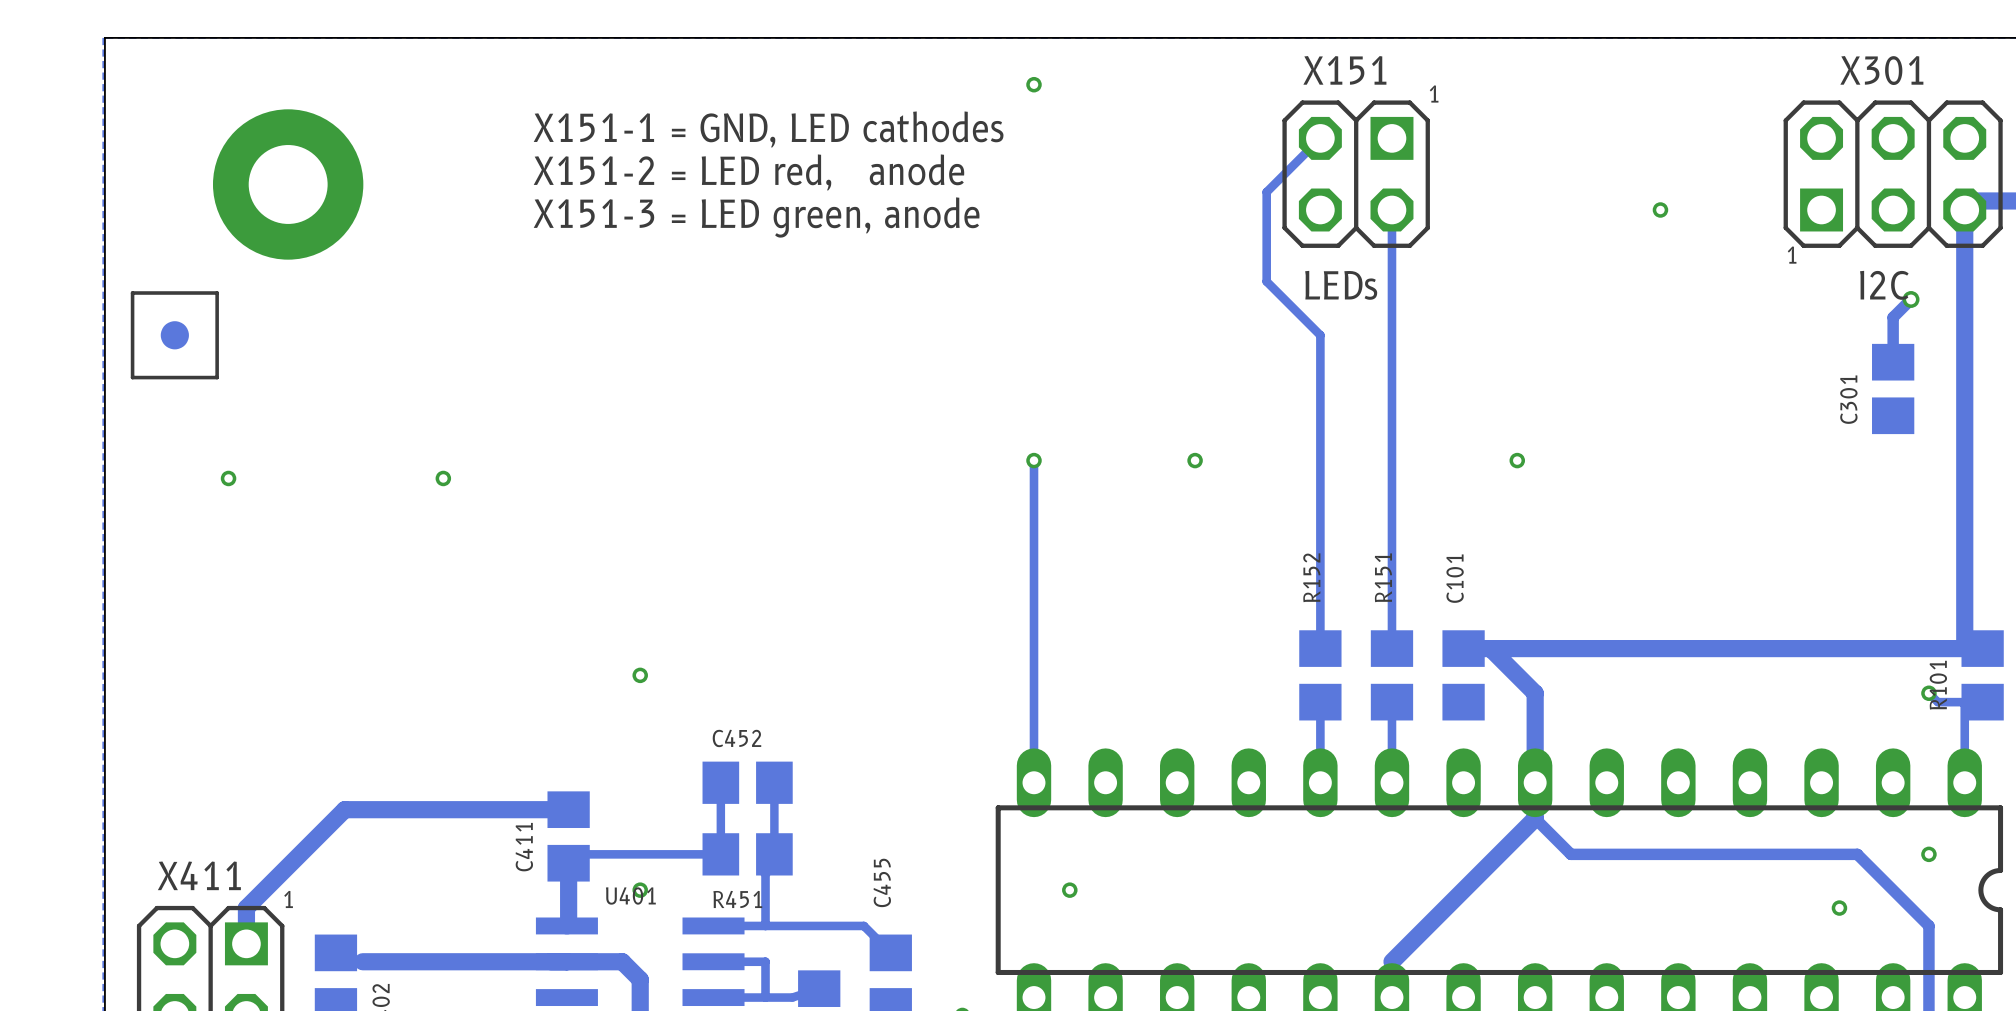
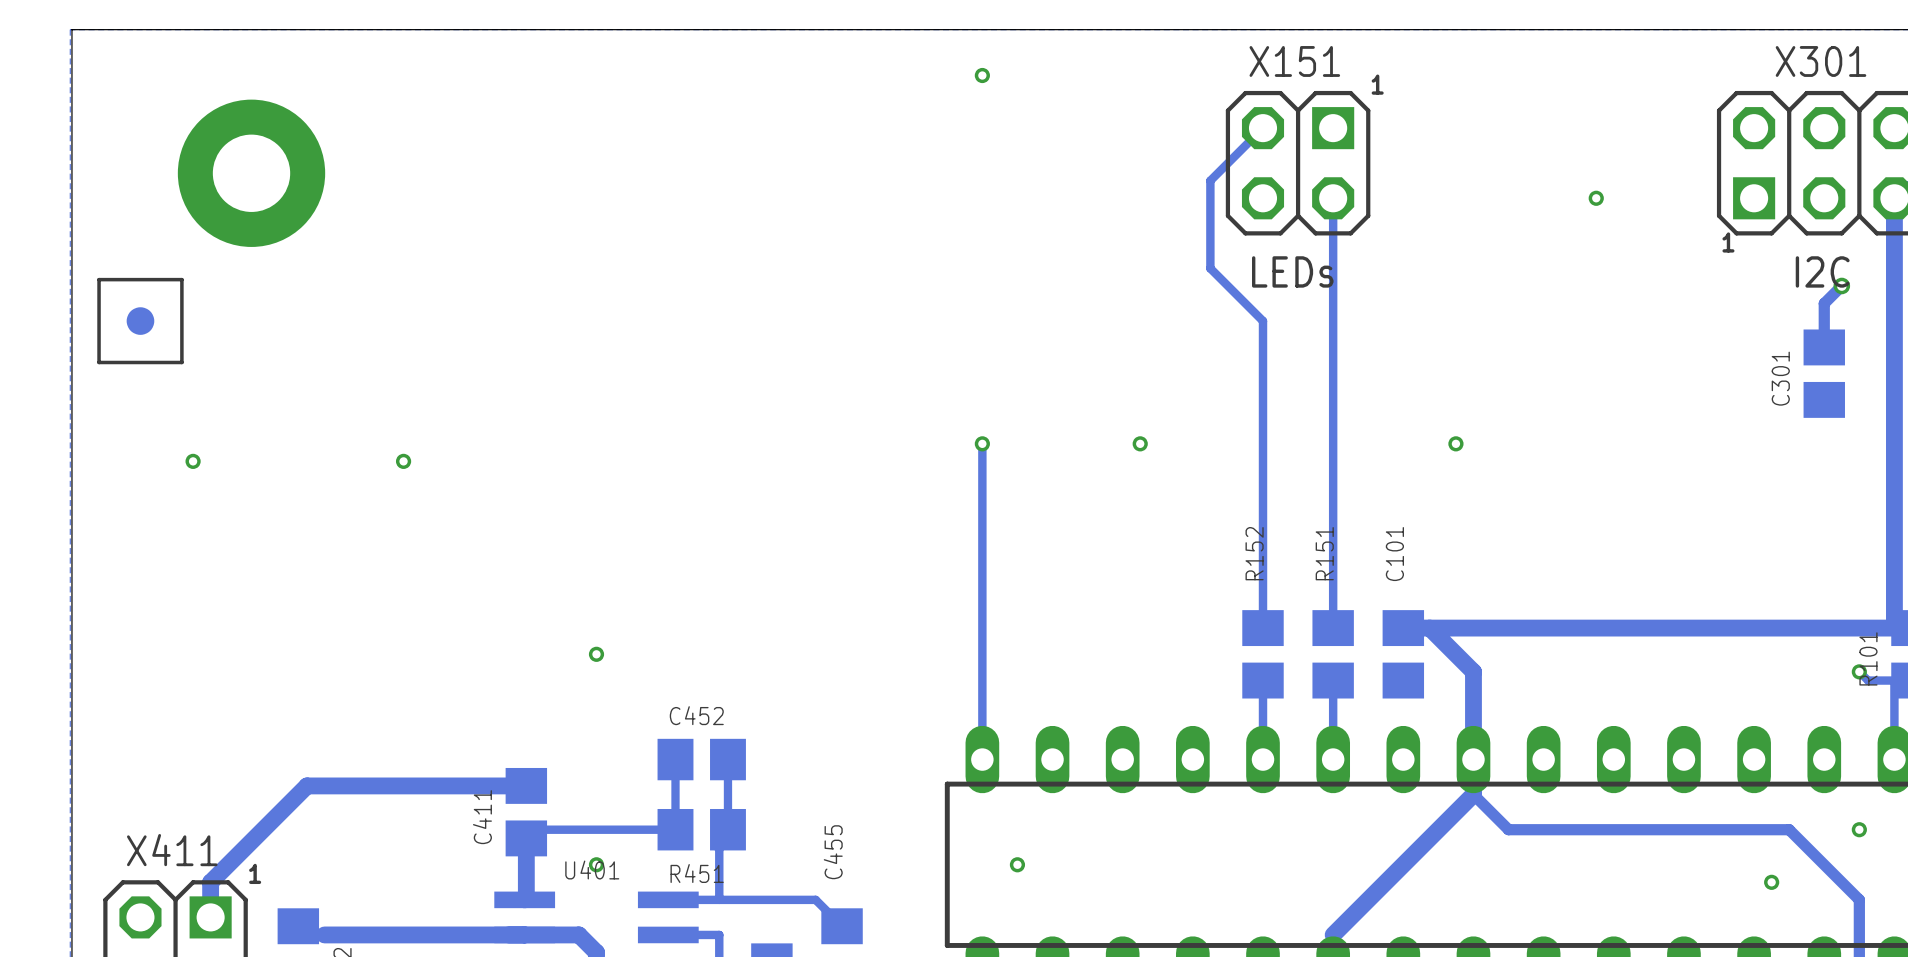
text: X151-1 = GND, LED cathodes (768, 129) -> none
text: X151-2 = LED red, anode (748, 172) -> none
text: X151-3 = LED green, anode (756, 217) -> none

